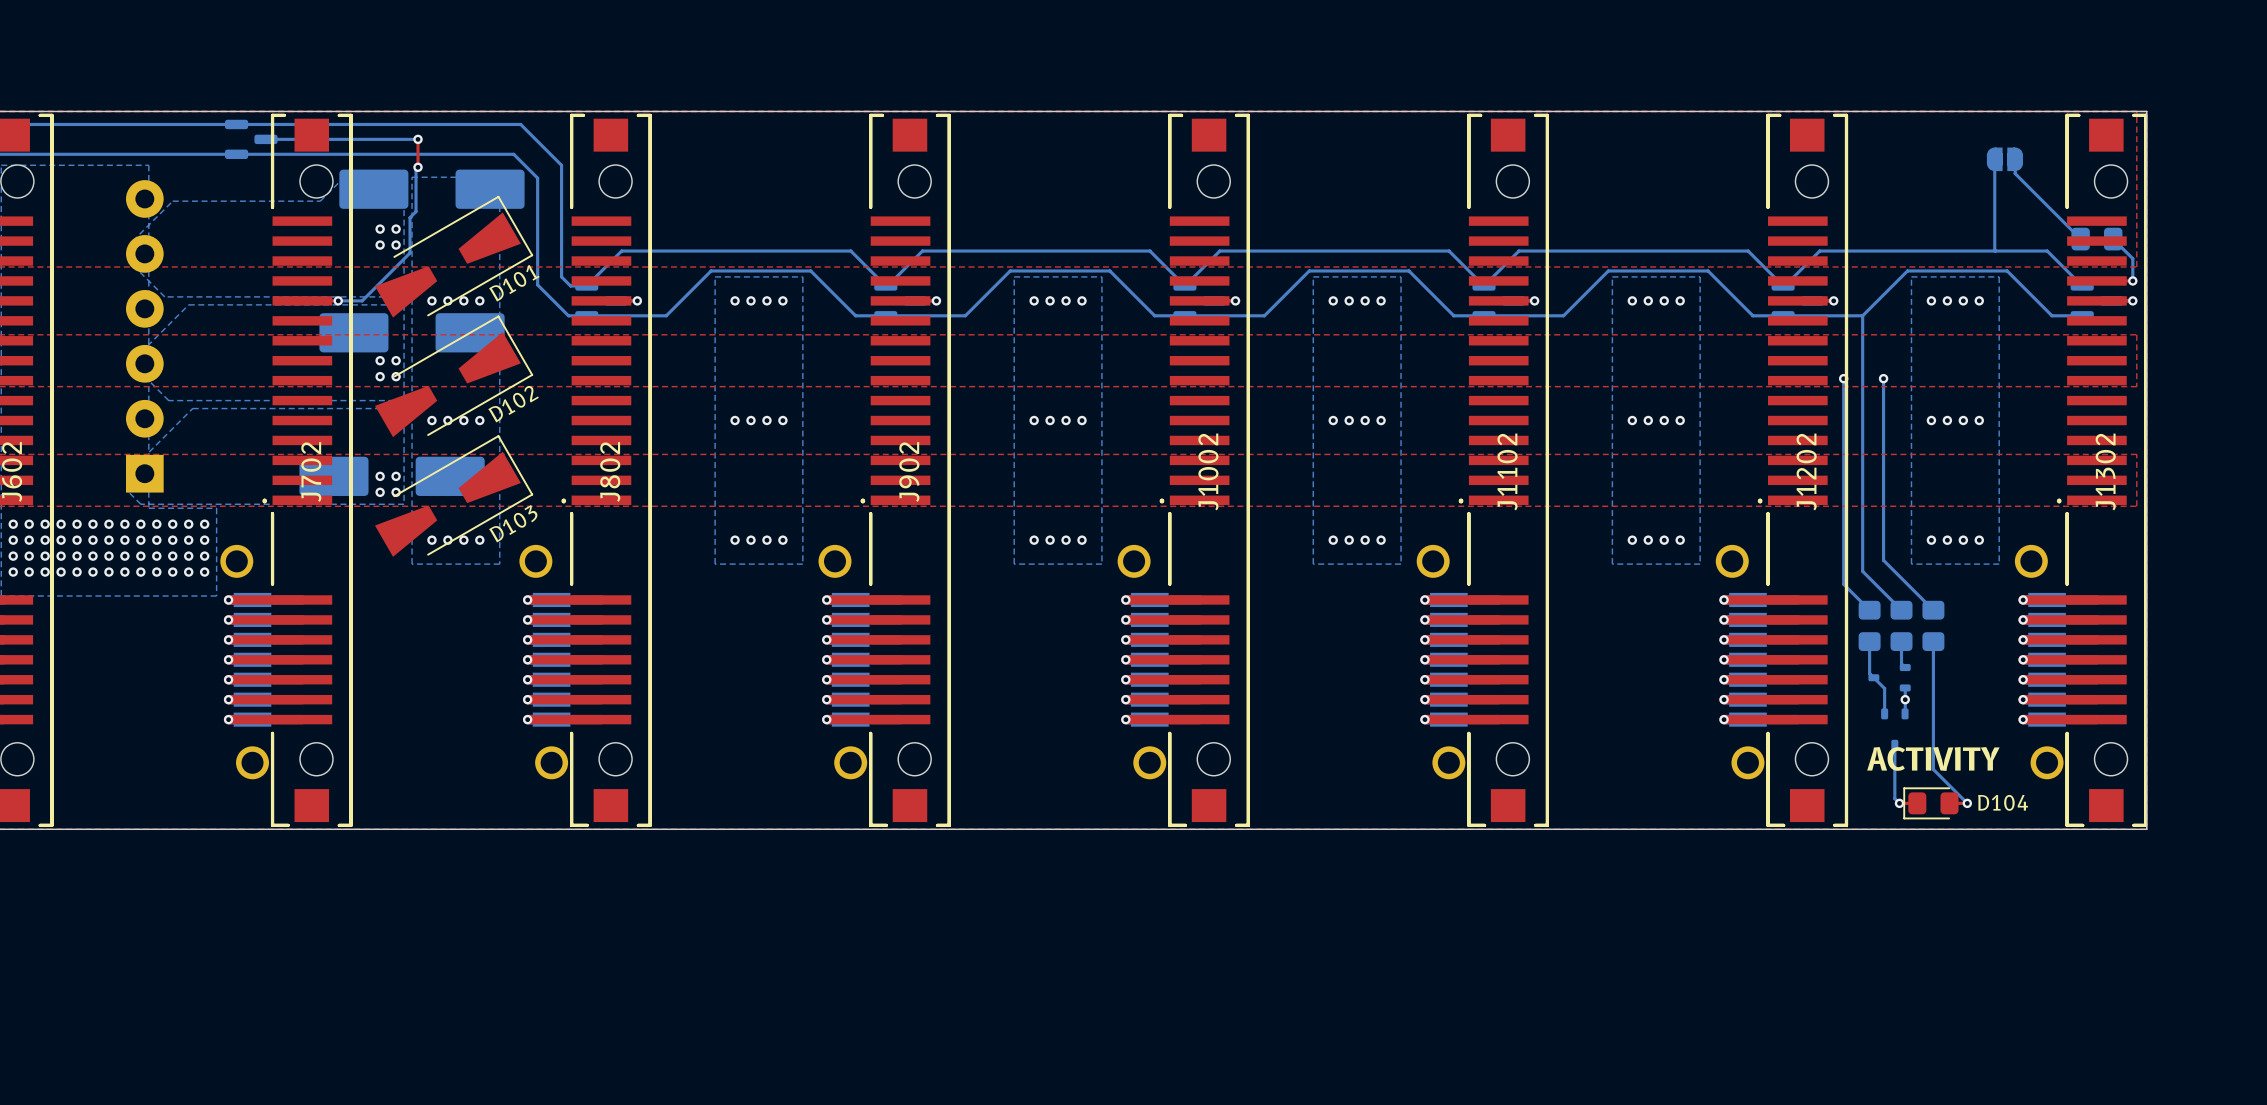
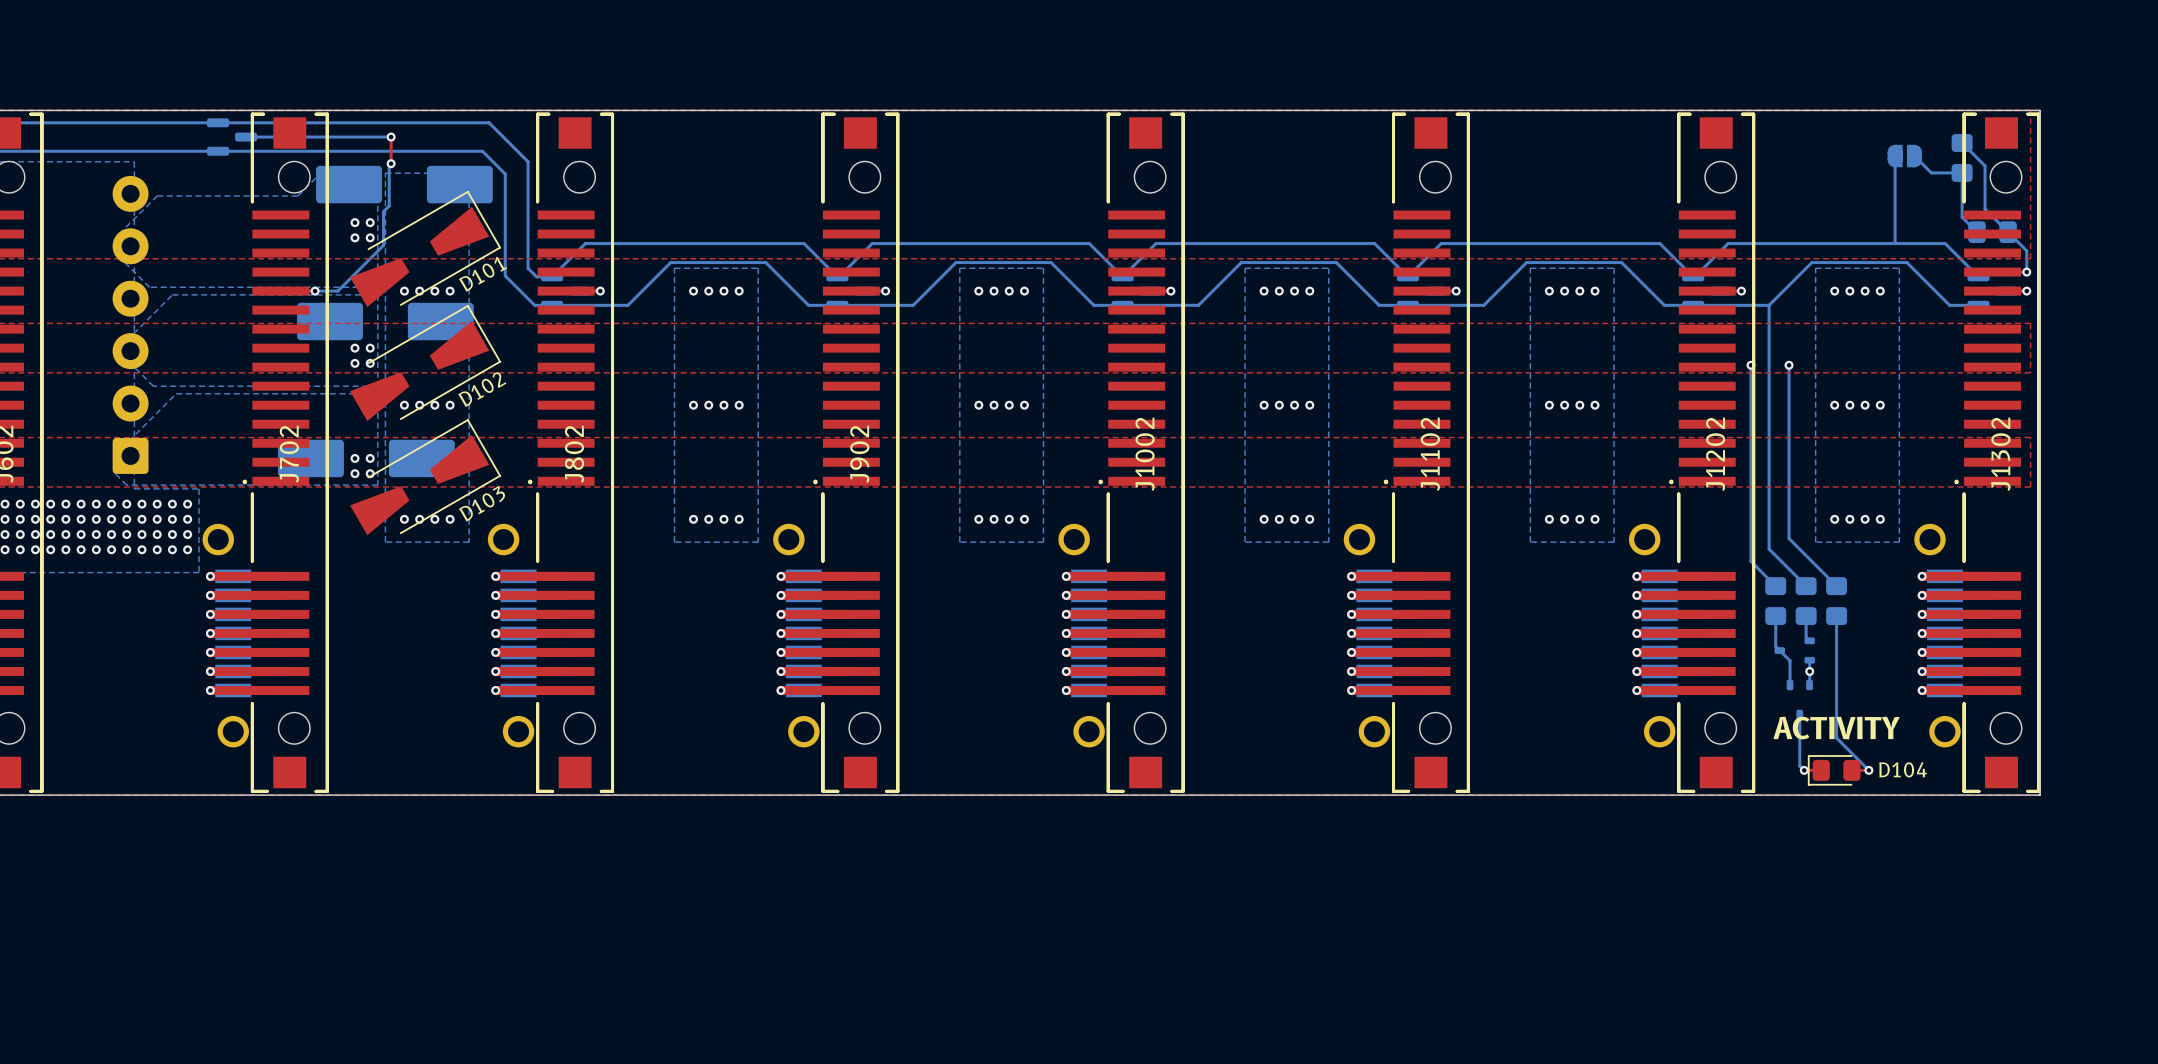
bottom track: none -> (1962, 142) (1985, 165) (1985, 209) (2008, 232)
bottom track: (2015, 159) (2015, 173) (2065, 223) -> (1914, 156) (1931, 172) (1962, 172) (1962, 217)
part: none -> (1962, 157)
part footprint: [125, 180, 164, 493] -> [112, 175, 149, 474]

